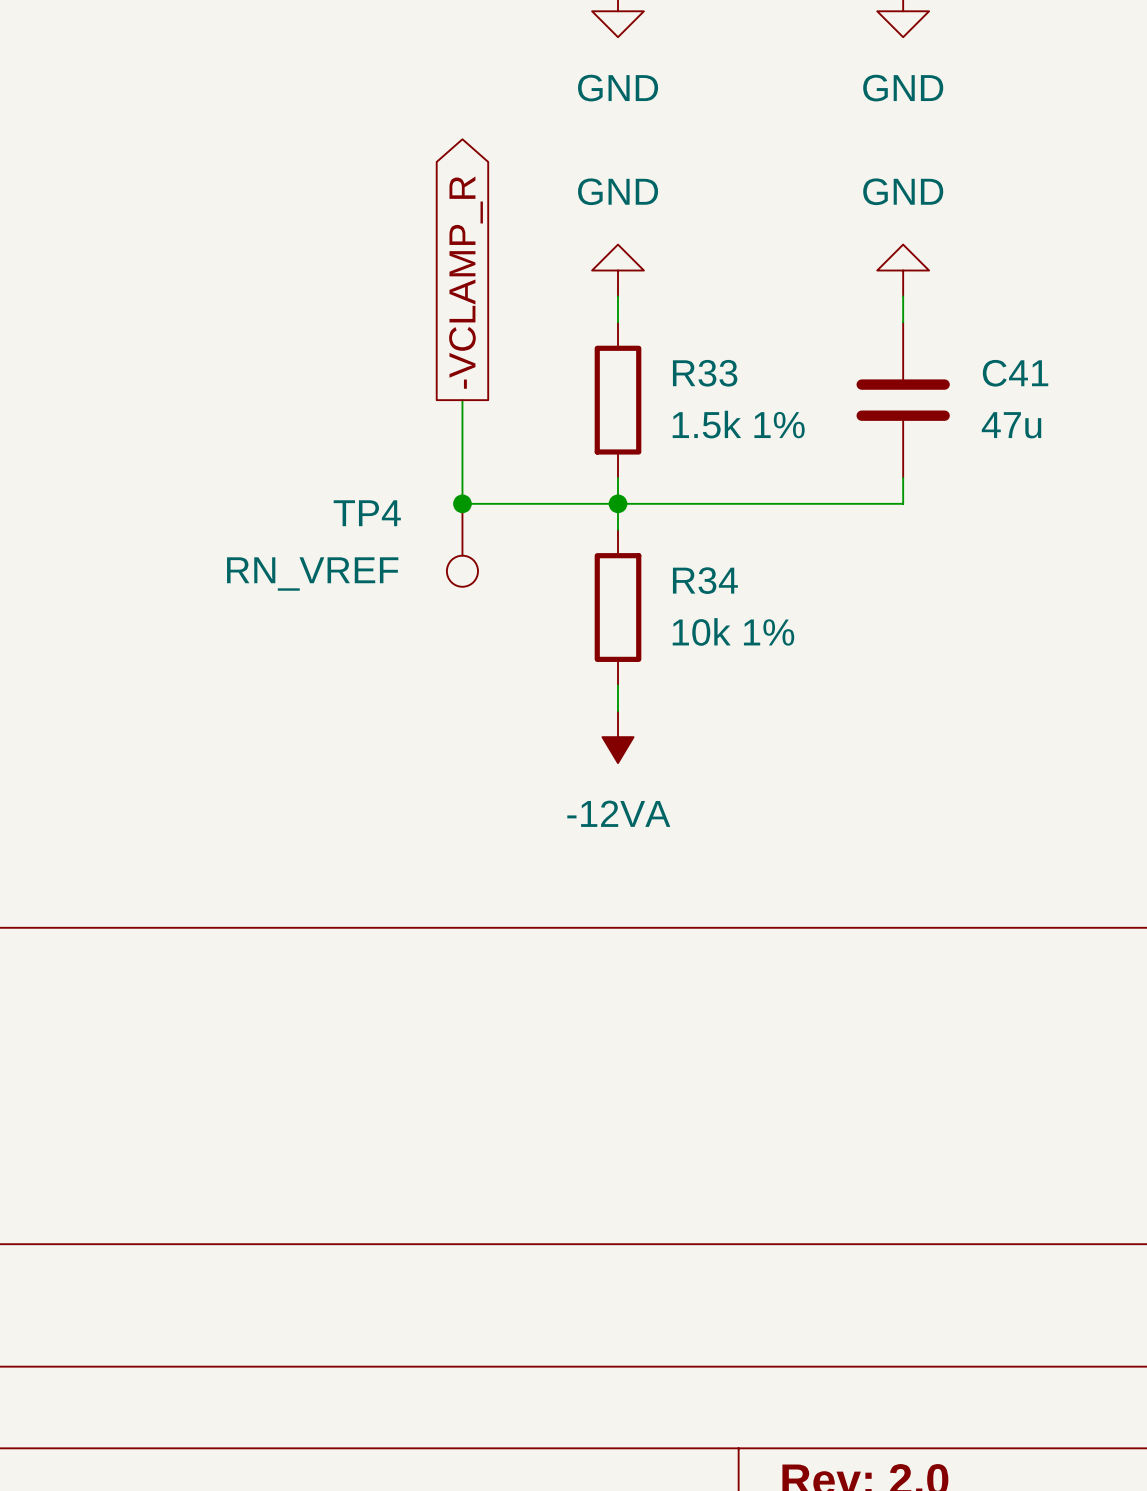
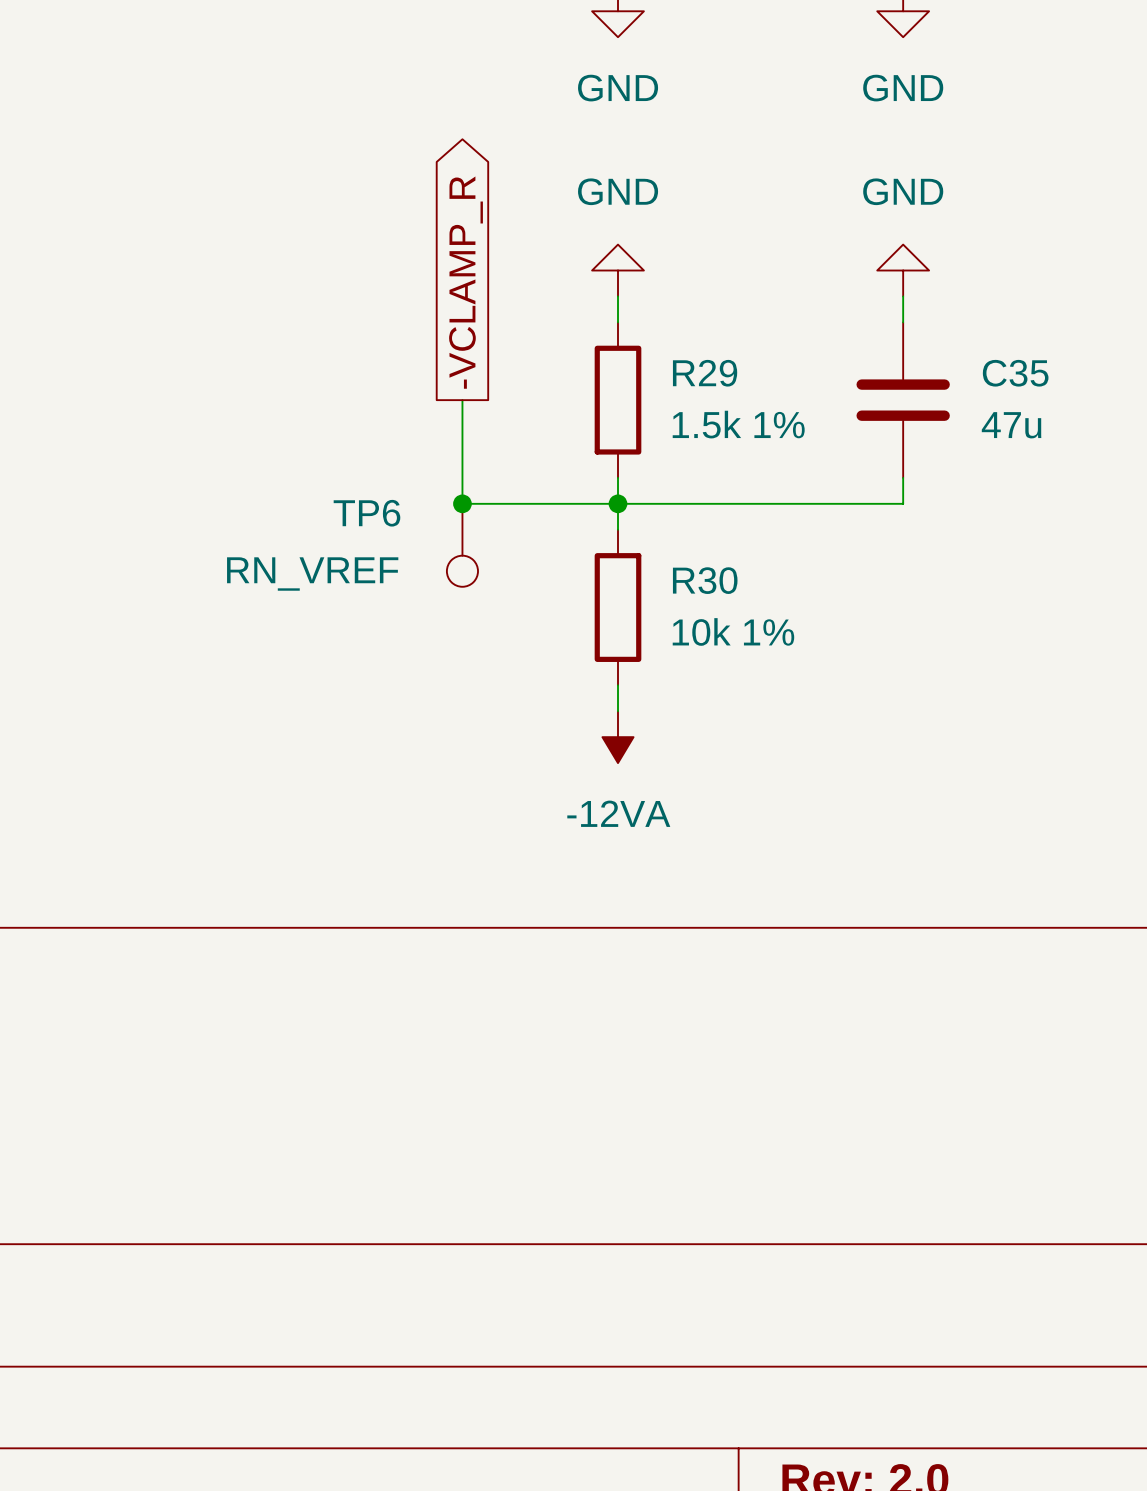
R33 name: R33 (705, 373) -> R29 (705, 373)
C41 name: C41 (1015, 373) -> C35 (1015, 373)
TP4 name: TP4 (367, 513) -> TP6 (366, 513)
R34 name: R34 (705, 580) -> R30 (705, 580)

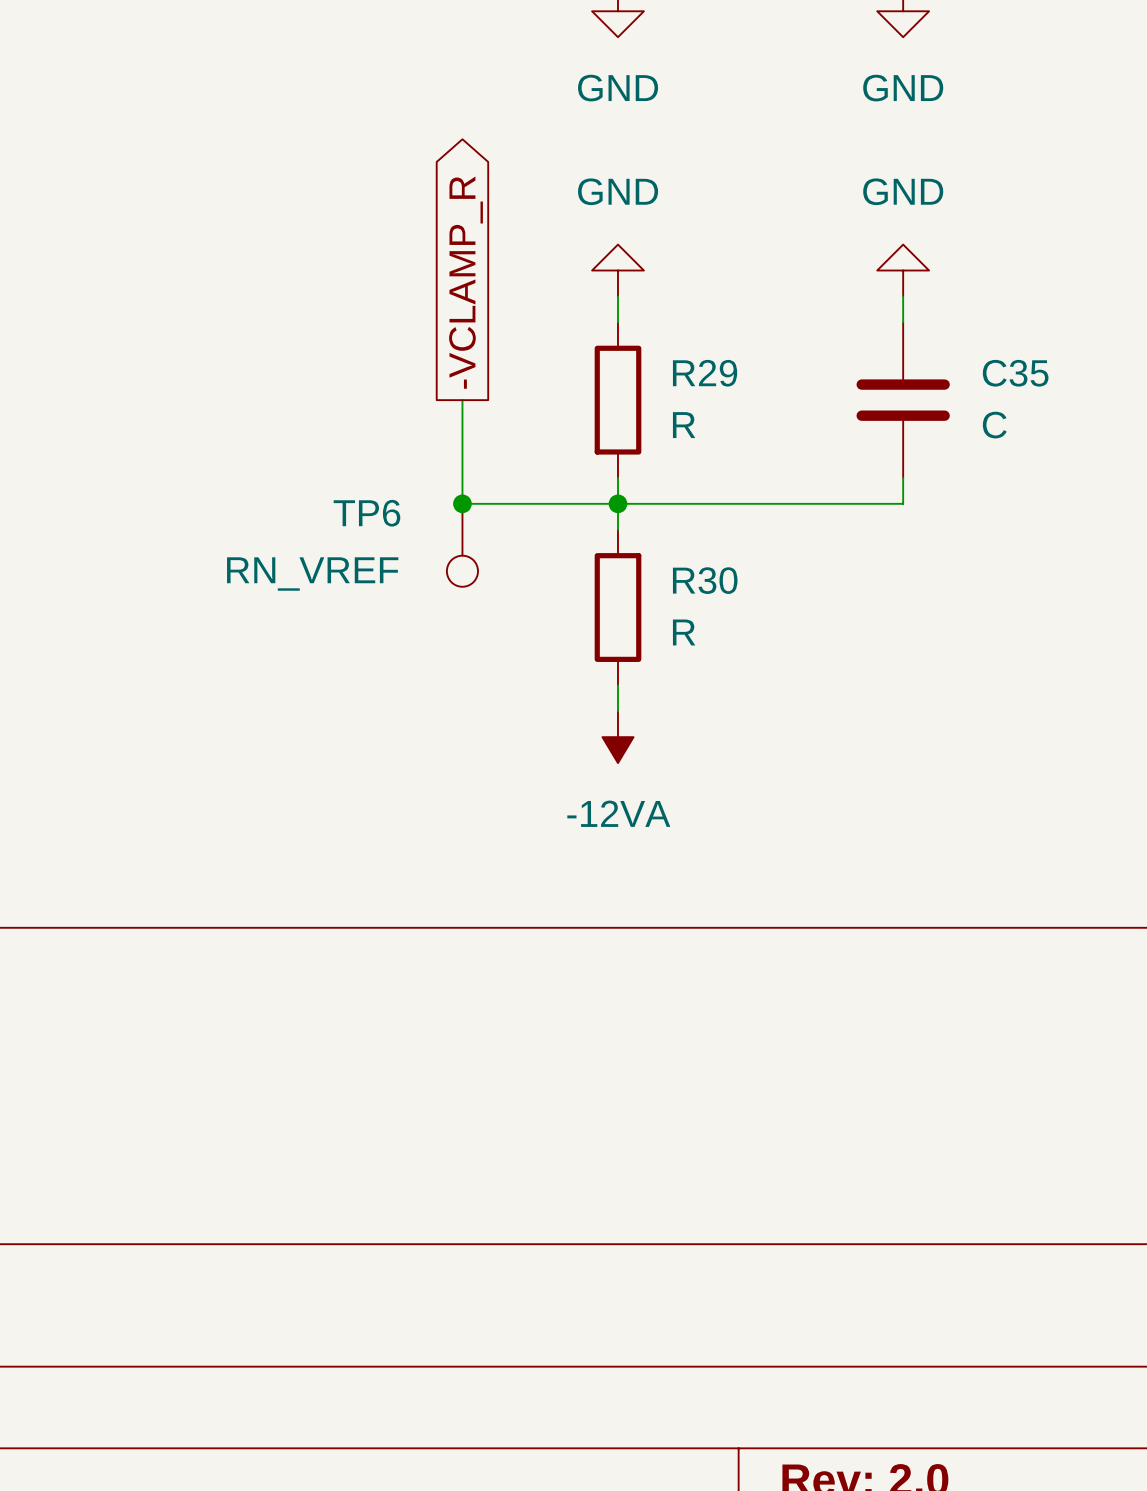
R29 value: 1.5k 1% (738, 424) -> R (684, 425)
C35 value: 47u (1011, 425) -> C (994, 425)
R30 value: 10k 1% (733, 631) -> R (684, 632)

